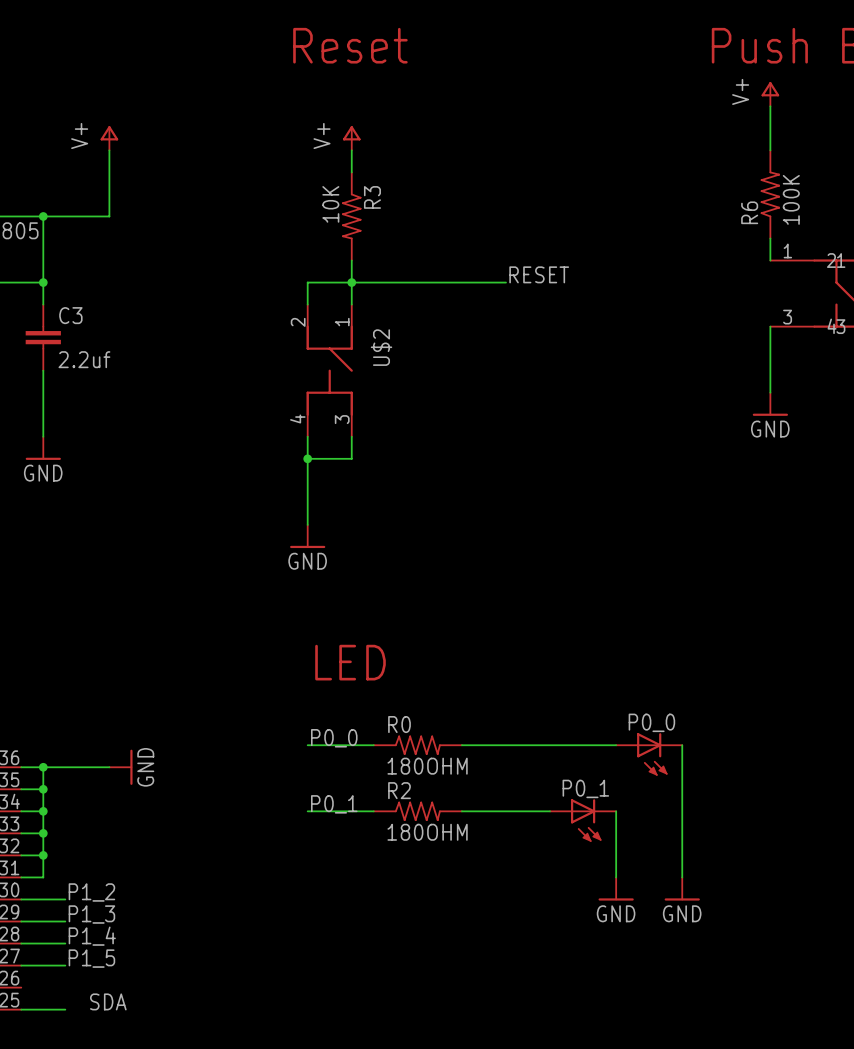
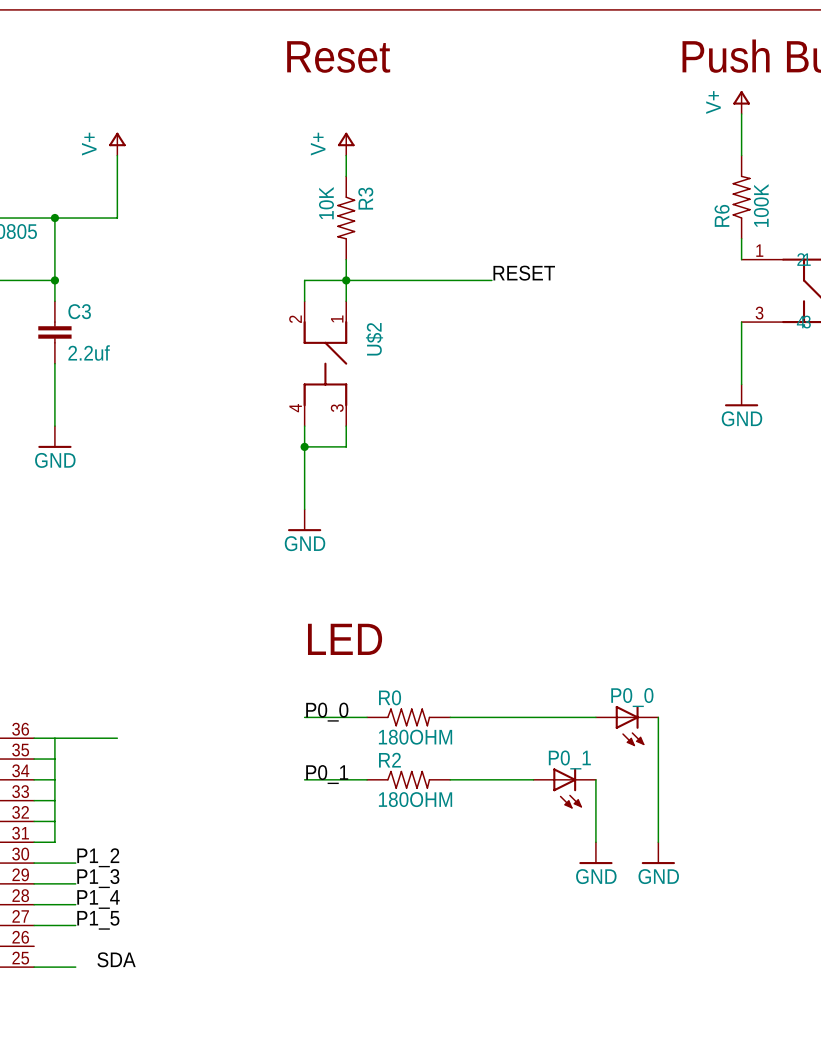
junction: (43, 767) -> none
power symbol: GND (120, 767) -> none
junction: (43, 789) -> none
junction: (43, 811) -> none
junction: (43, 833) -> none
junction: (43, 855) -> none

